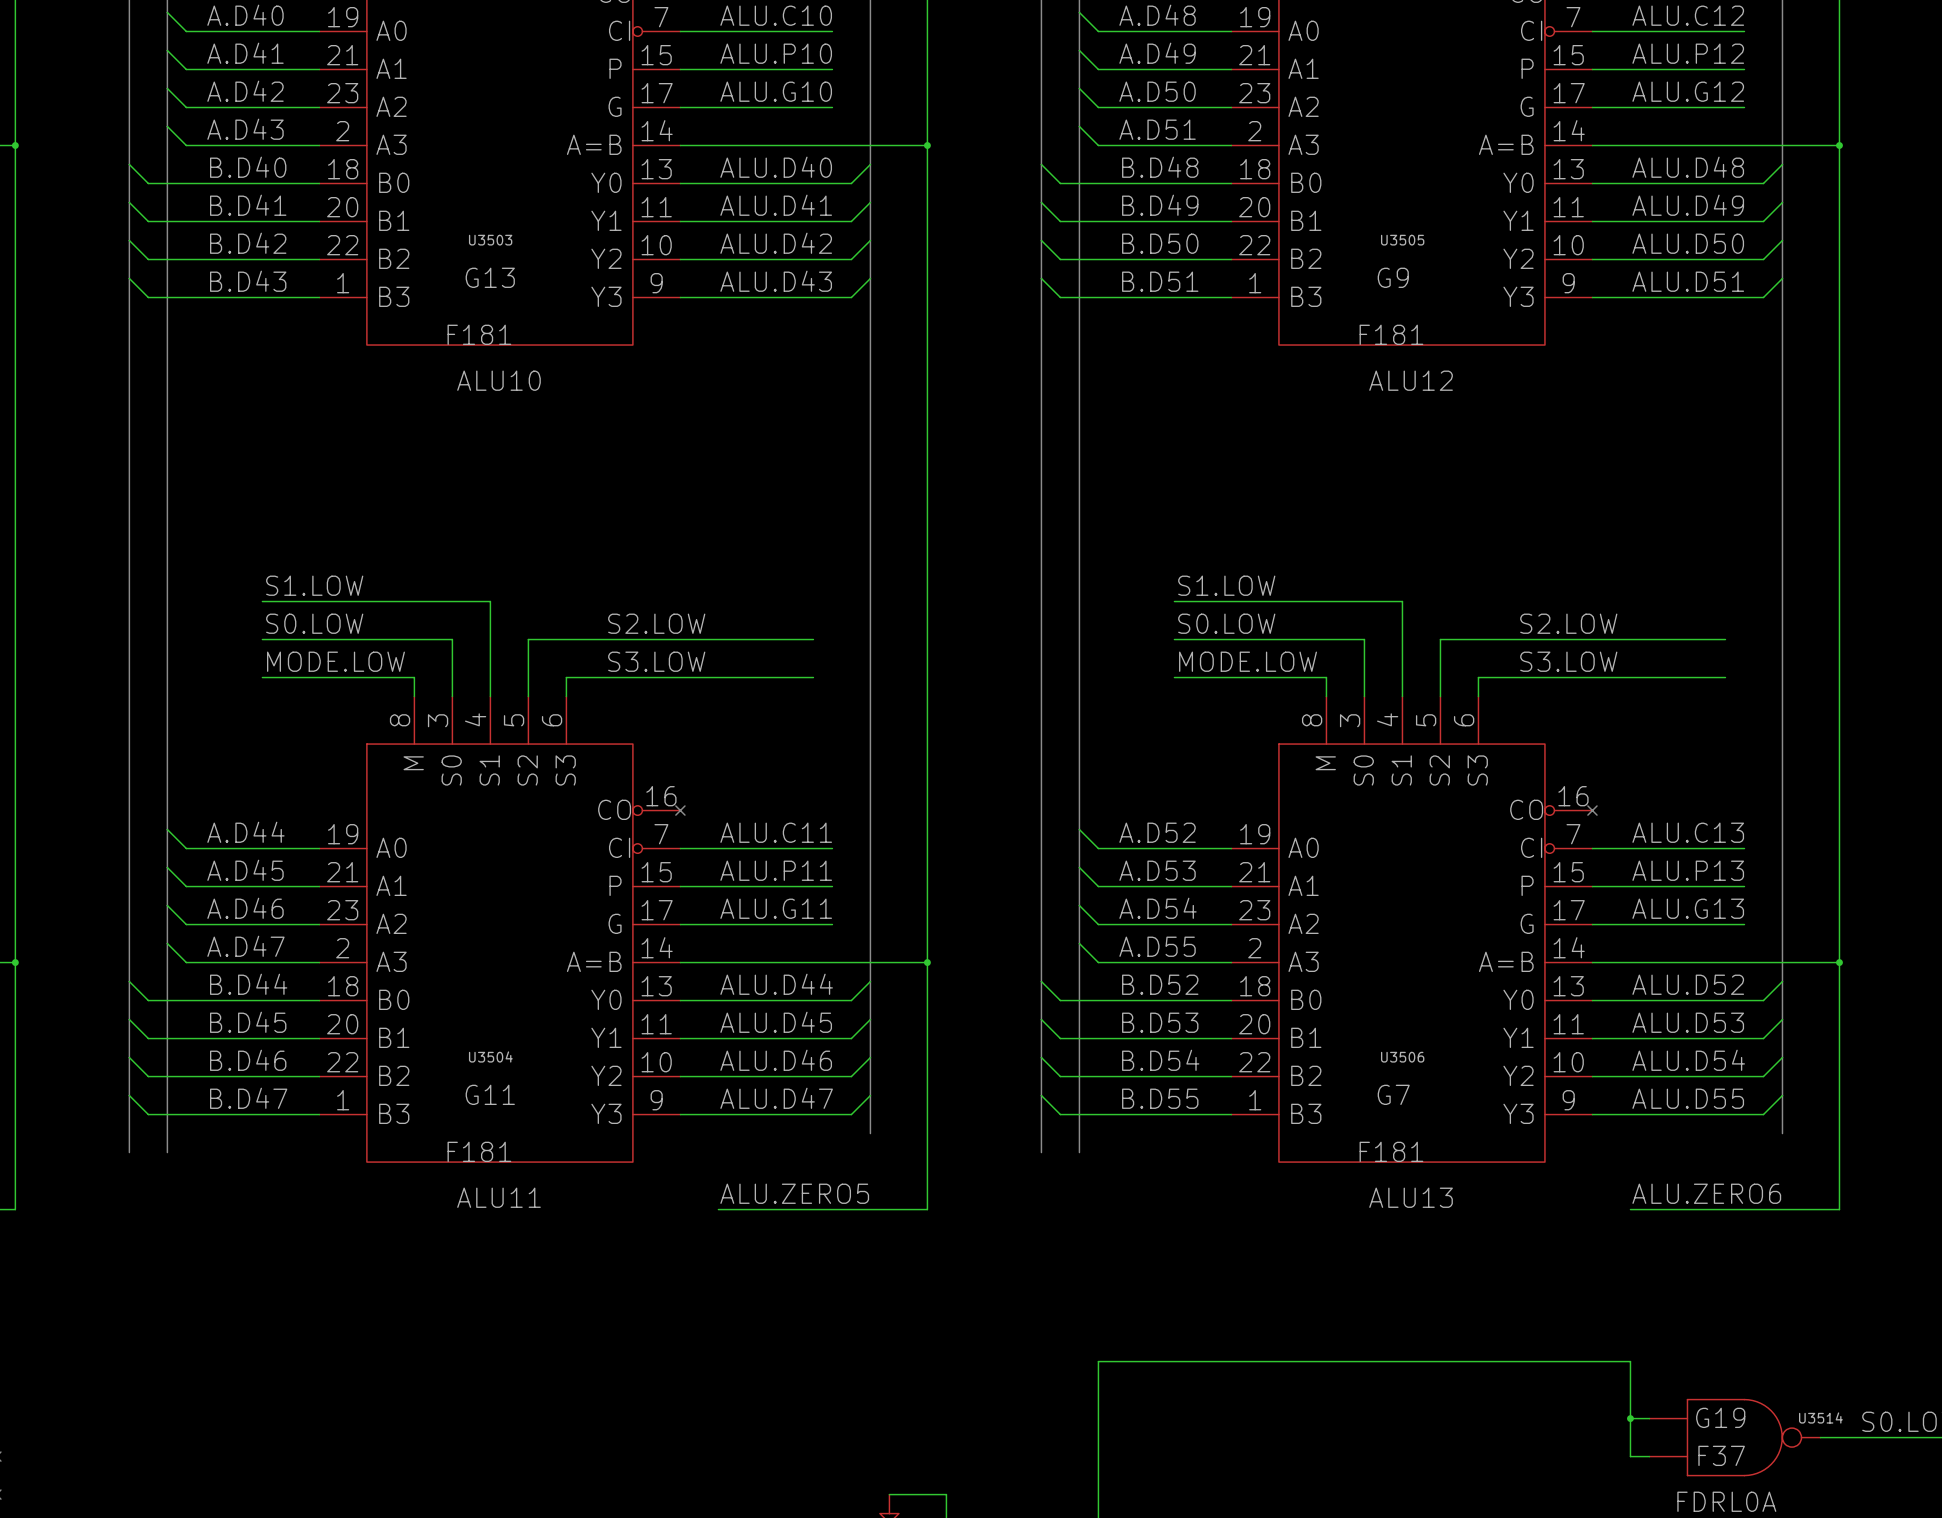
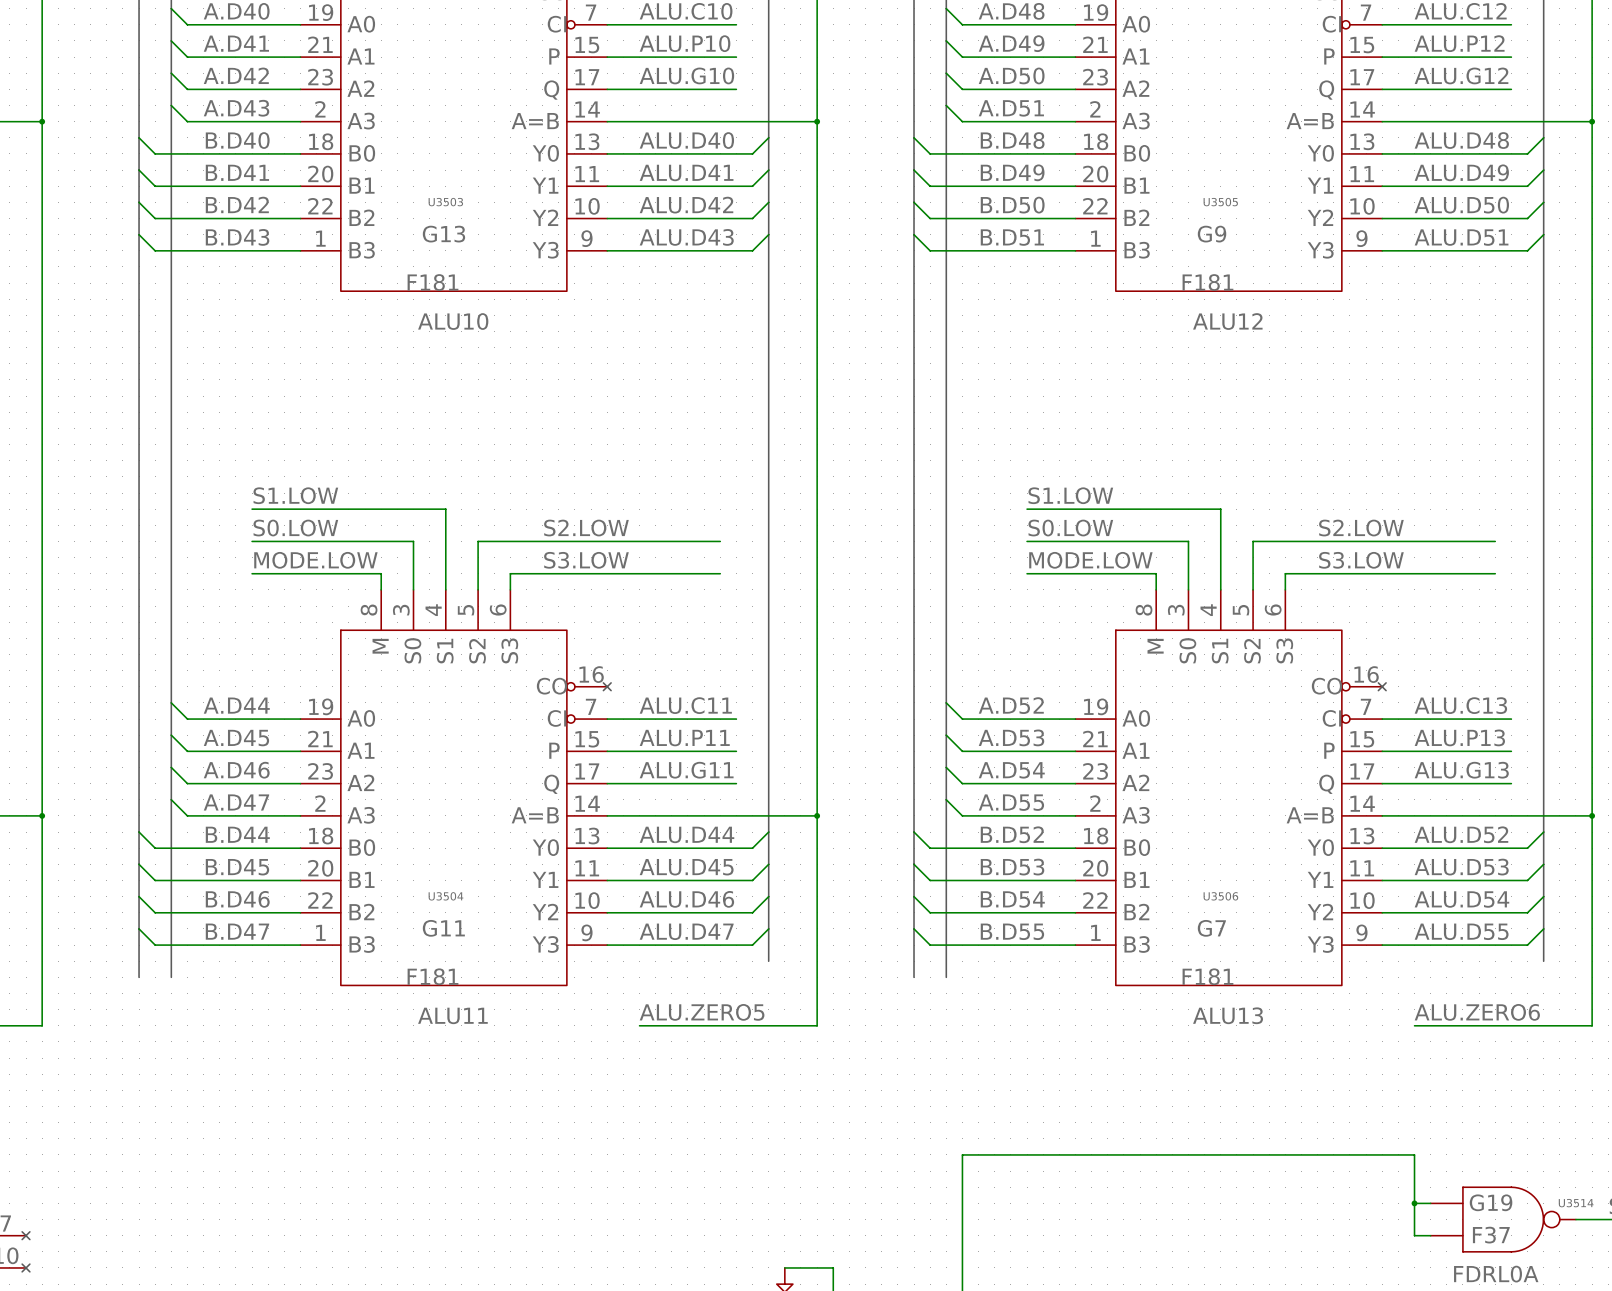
U3503 pin name: G (615, 106) -> Q (551, 90)
U3505 pin name: G (1527, 106) -> Q (1326, 90)
U3504 pin name: G (615, 923) -> Q (551, 784)
U3506 pin name: G (1527, 923) -> Q (1326, 784)

